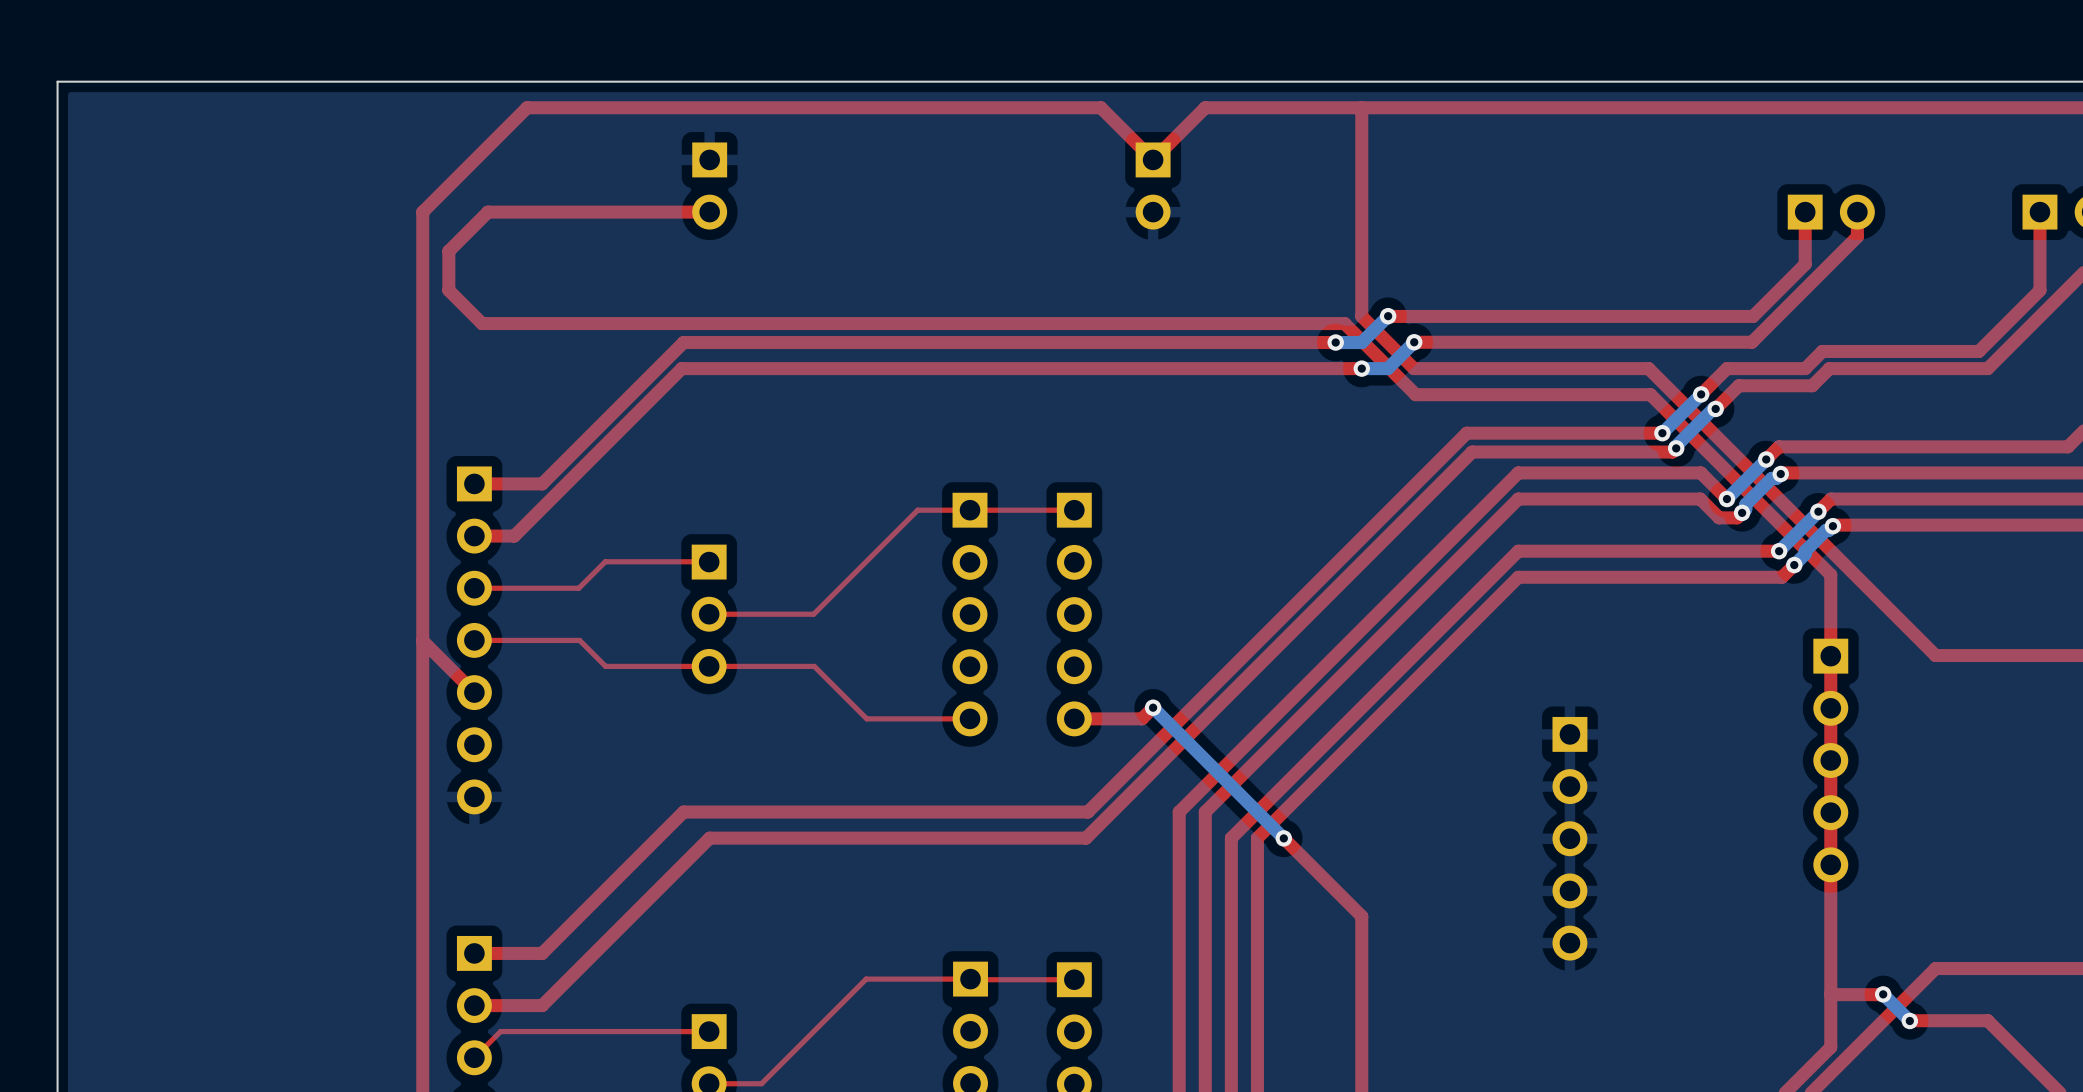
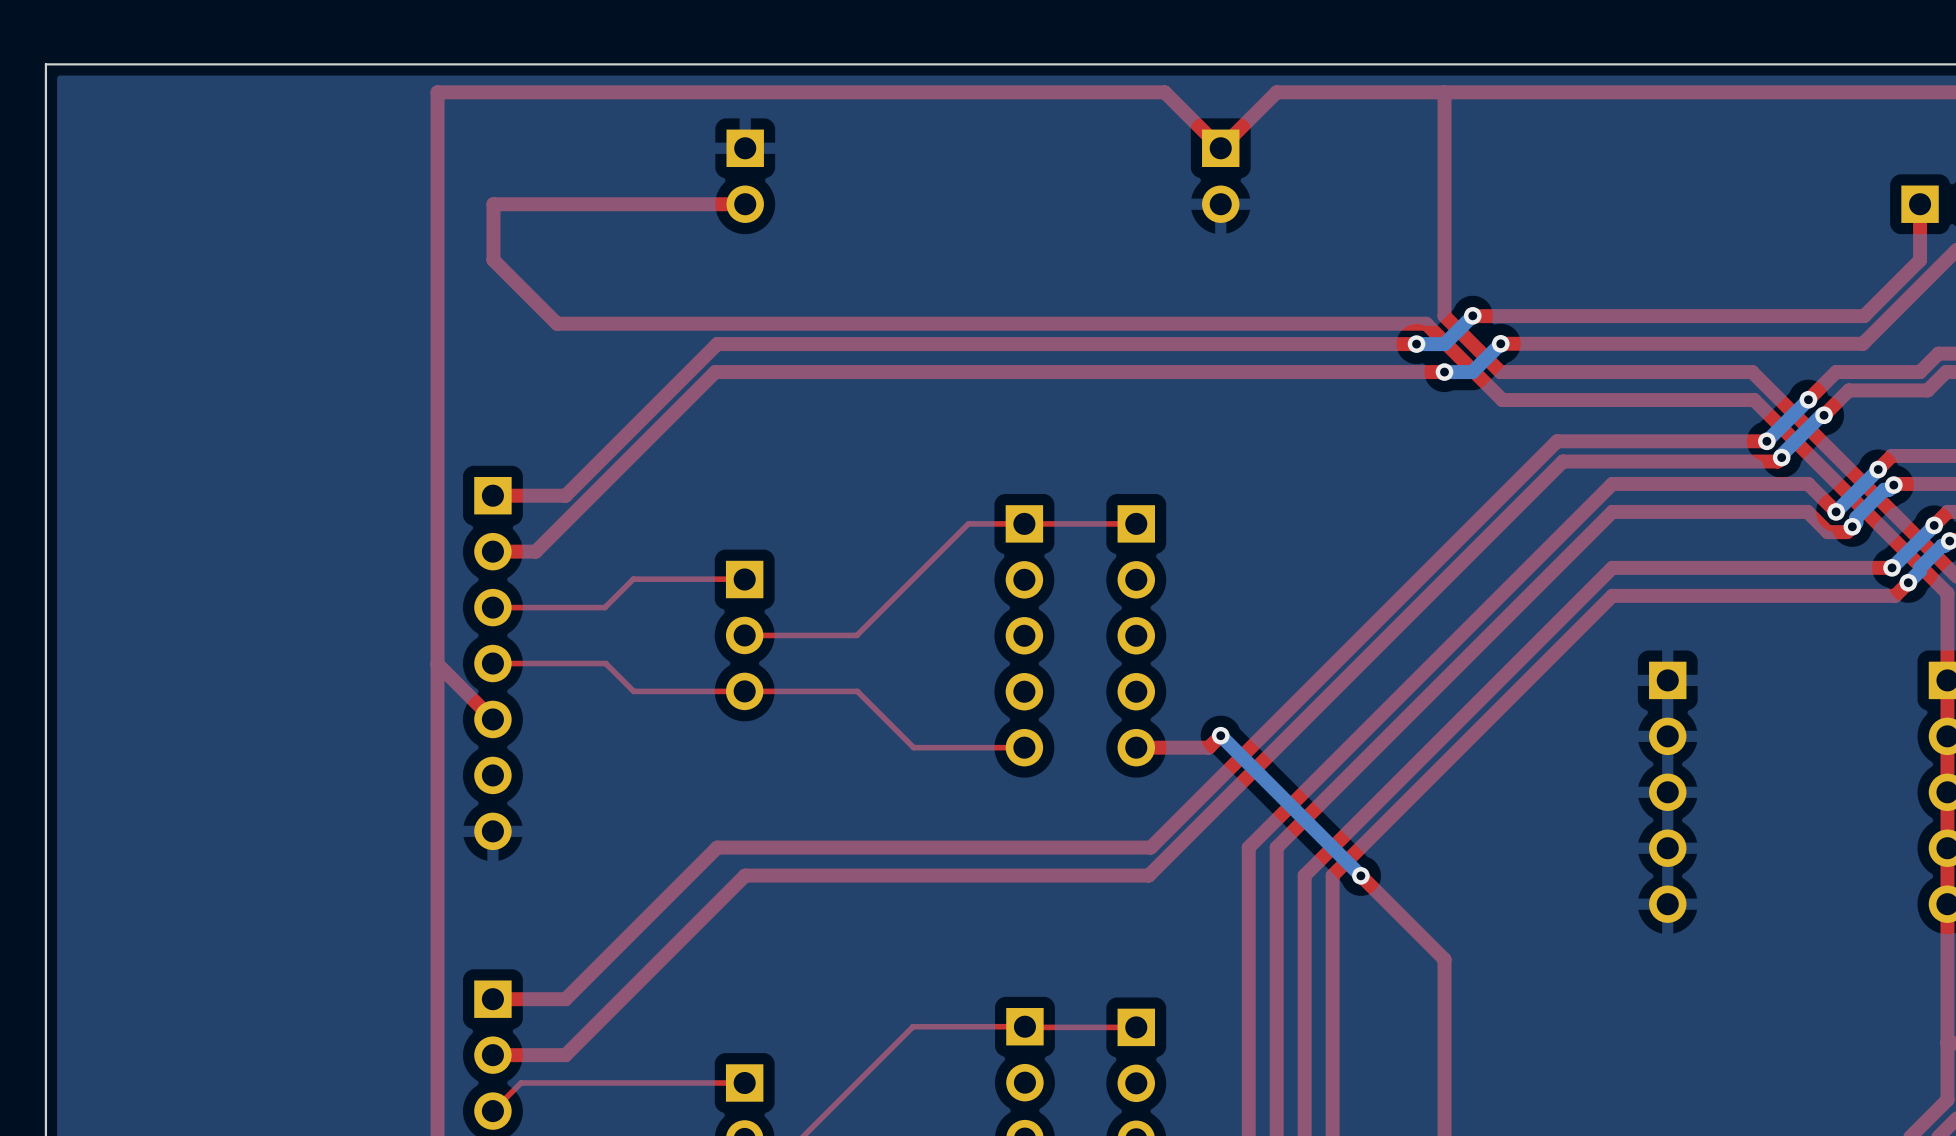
top track: (527, 107) (422, 212) -> (549, 92) (437, 92) (437, 204)
top track: (487, 212) (448, 251) (448, 290) (482, 323) (534, 323) -> (507, 204) (493, 204) (493, 260) (557, 323)
part position: (1569, 838) -> (1667, 792)

